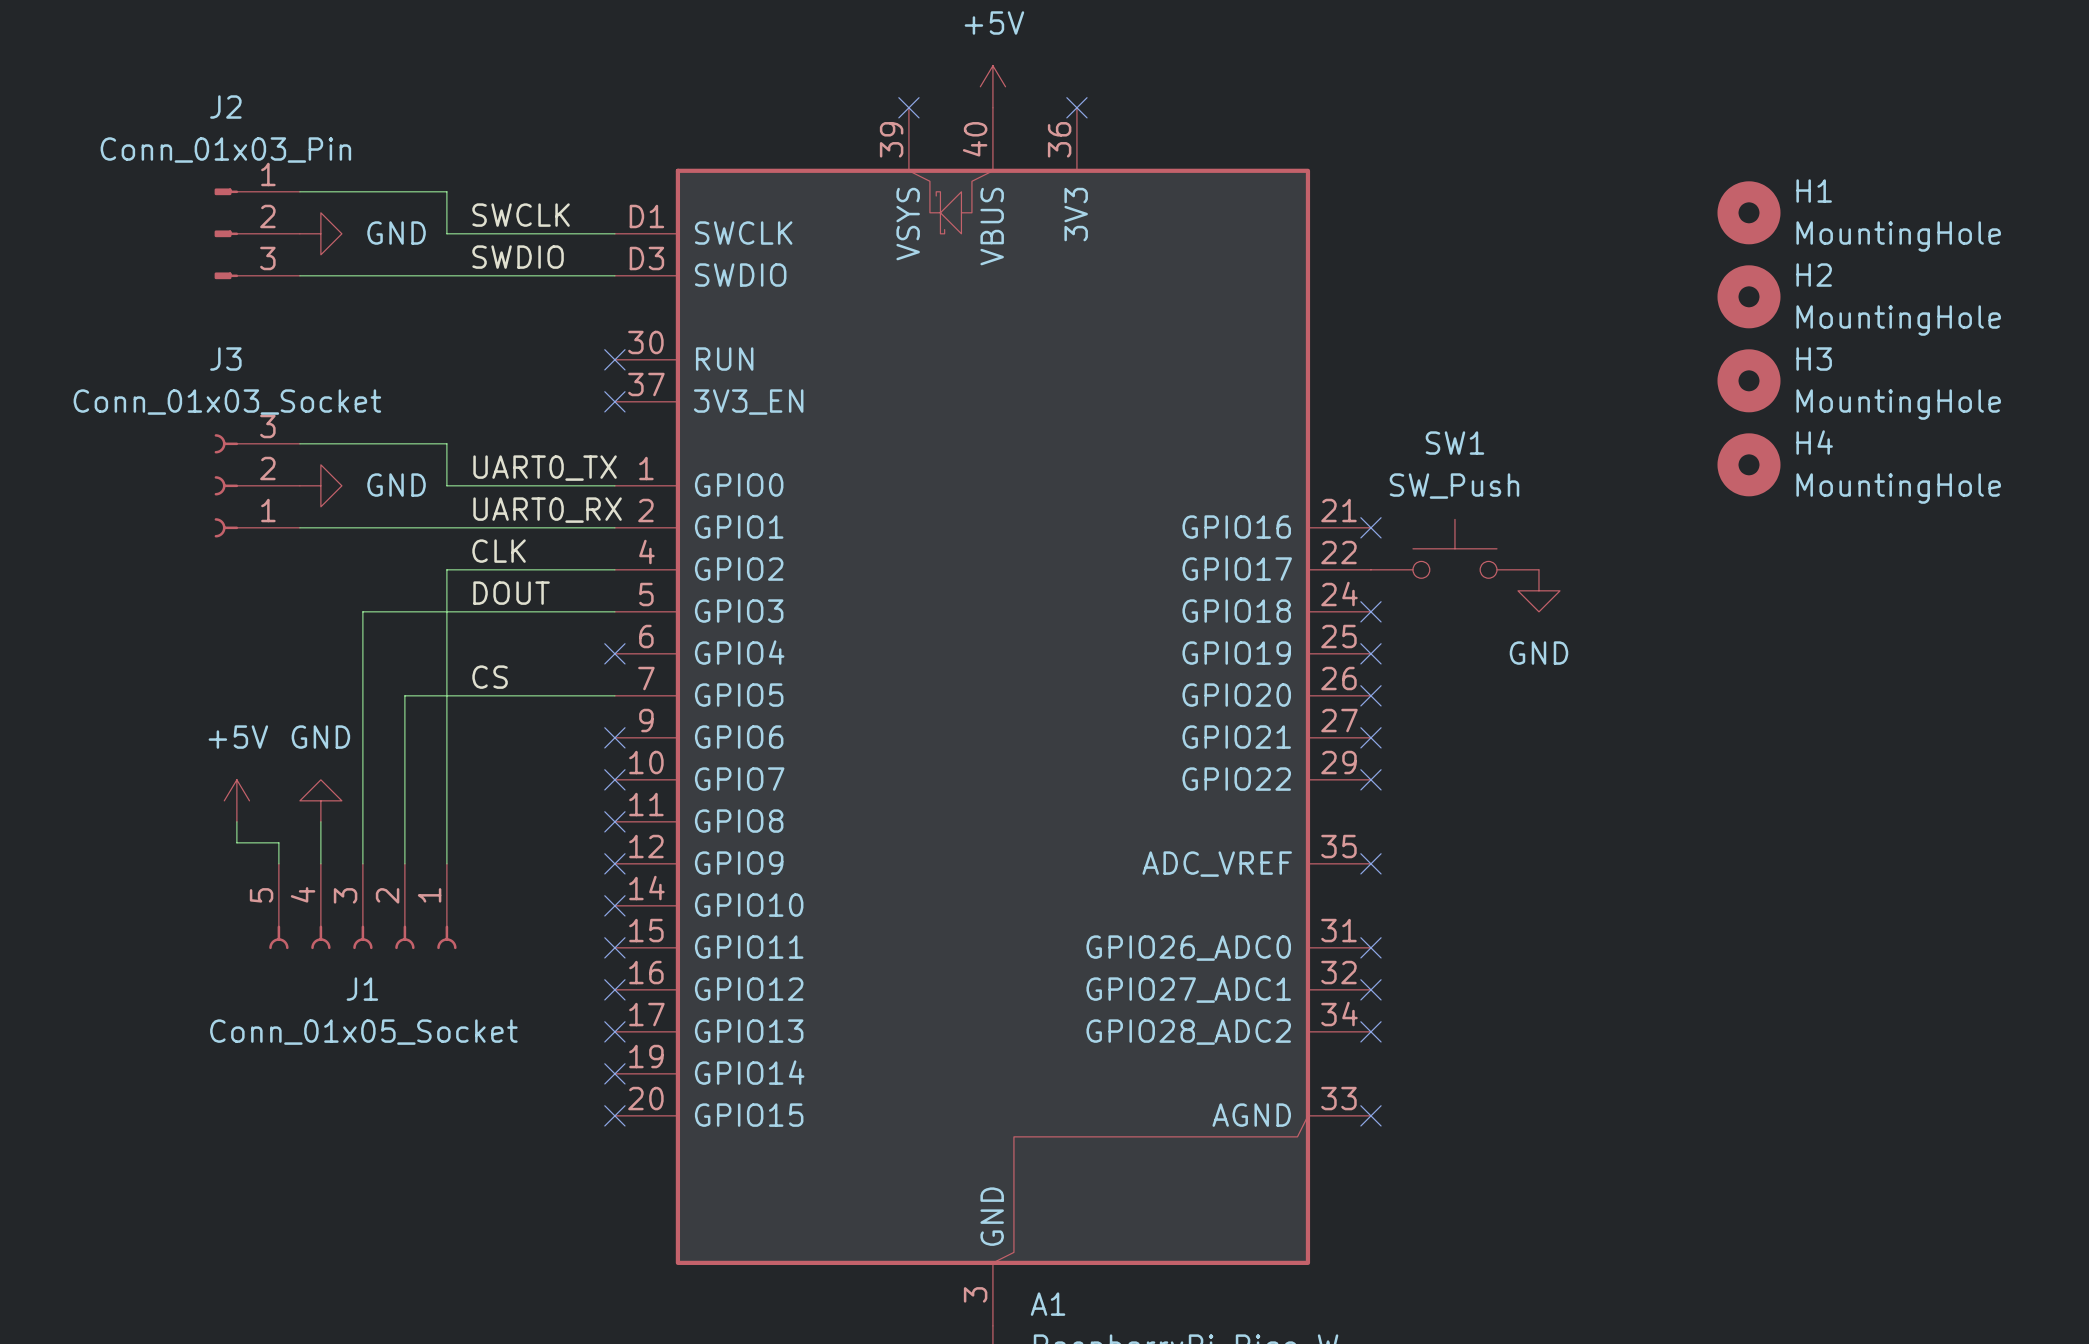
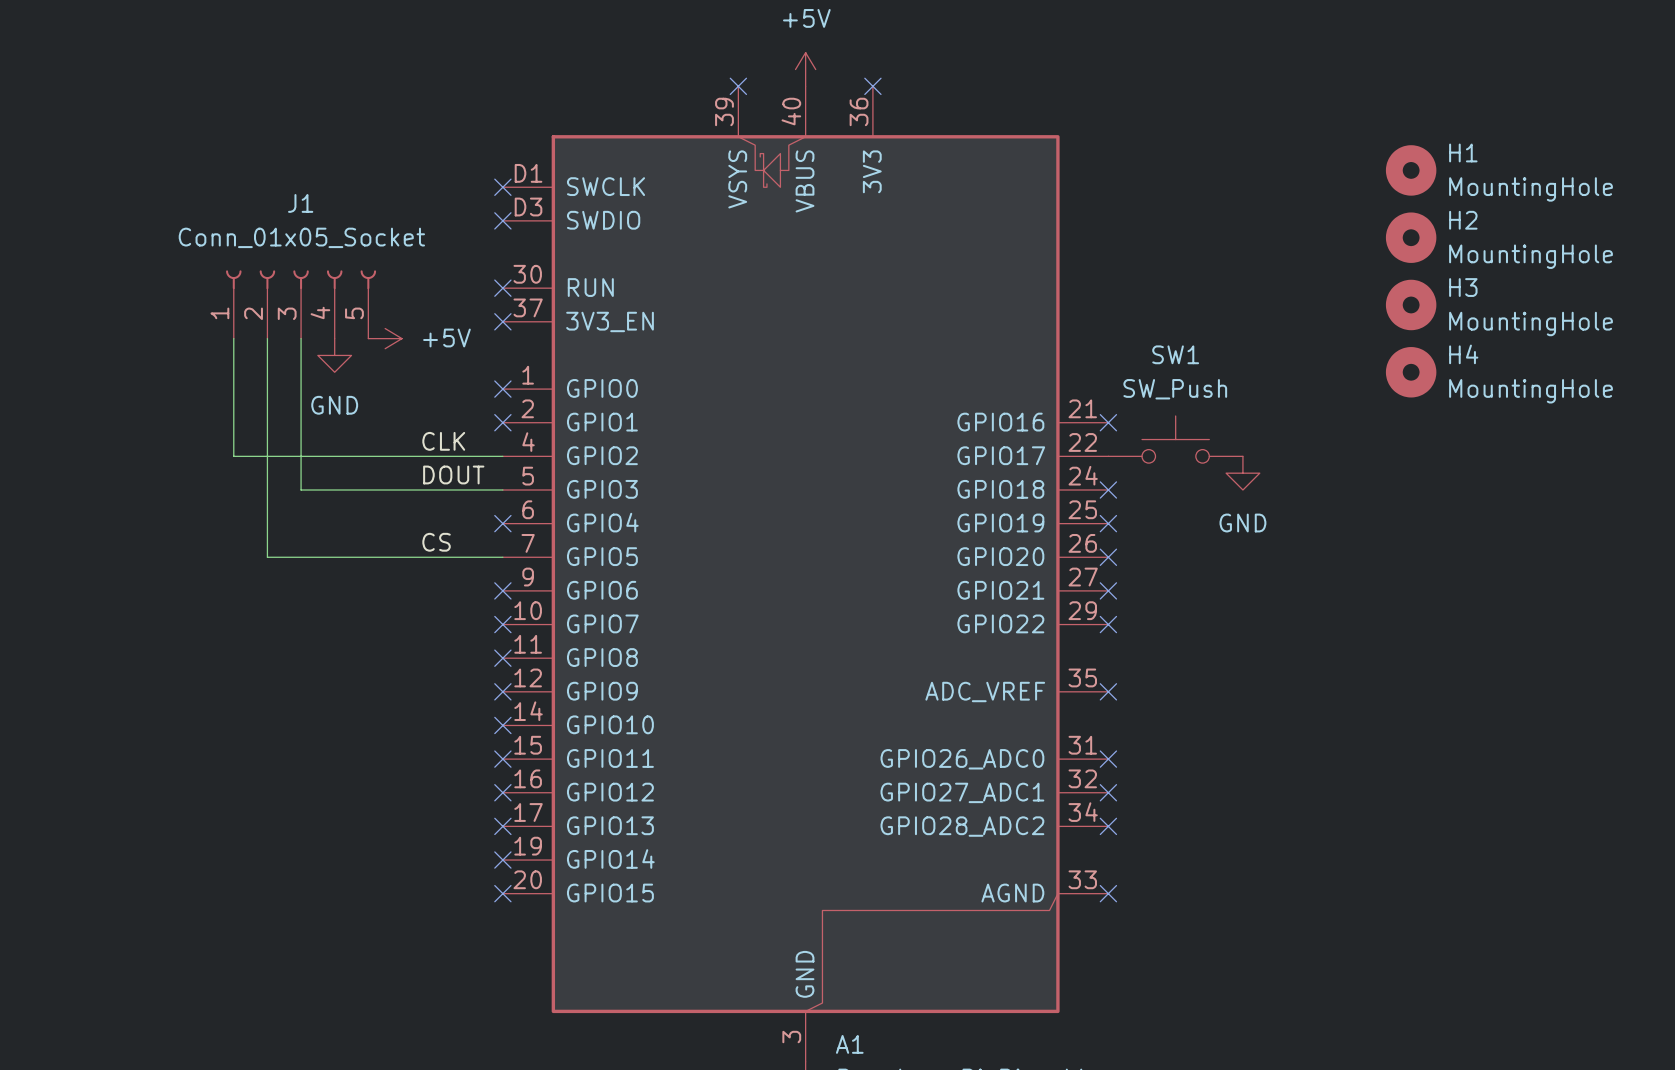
wire: (299, 191) (446, 191) (446, 233) (614, 233) -> none
label: SWCLK (521, 215) -> none
J2: Conn_01x03_Pin (257, 233) -> none
power symbol: GND (320, 233) -> none
no-connect mark: none -> (502, 187)
label: SWDIO (518, 257) -> none
wire: (299, 275) (614, 275) -> none
no-connect mark: none -> (502, 220)
power symbol: none -> +5V (385, 338)
wire: (299, 443) (446, 443) (446, 485) (614, 485) -> none
label: UART0_TX (545, 468) -> none
J3: Conn_01x03_Socket (257, 485) -> none
power symbol rotation: 0° (320, 485) -> 90° clockwise (334, 355)
power symbol position: GND (320, 485) -> GND (334, 355)
no-connect mark: none -> (502, 389)
label: UART0_RX (547, 510) -> none
wire: (299, 527) (614, 527) -> none
no-connect mark: none -> (502, 422)
label position: CLK (499, 551) -> CLK (443, 441)
wire: (446, 569) (446, 863) -> (368, 456) (233, 456) (233, 338)
label position: DOUT (511, 593) -> DOUT (453, 474)
wire: (362, 611) (362, 863) -> (301, 489) (301, 338)
label position: CS (490, 677) -> CS (436, 542)
wire: (404, 695) (404, 863) -> (334, 557) (267, 557) (267, 338)
power symbol: +5V (236, 800) -> none
power symbol: GND (320, 800) -> none
wire: (236, 821) (236, 842) (278, 842) (278, 863) -> none
wire: (320, 821) (320, 863) -> none
J1 position: (362, 906) -> (301, 304)
J1 rotation: 0° (362, 937) -> 180° (301, 279)
J1 name position: J1 (362, 989) -> J1 (300, 203)
J1 value position: Conn_01x05_Socket (363, 1032) -> Conn_01x05_Socket (301, 237)

